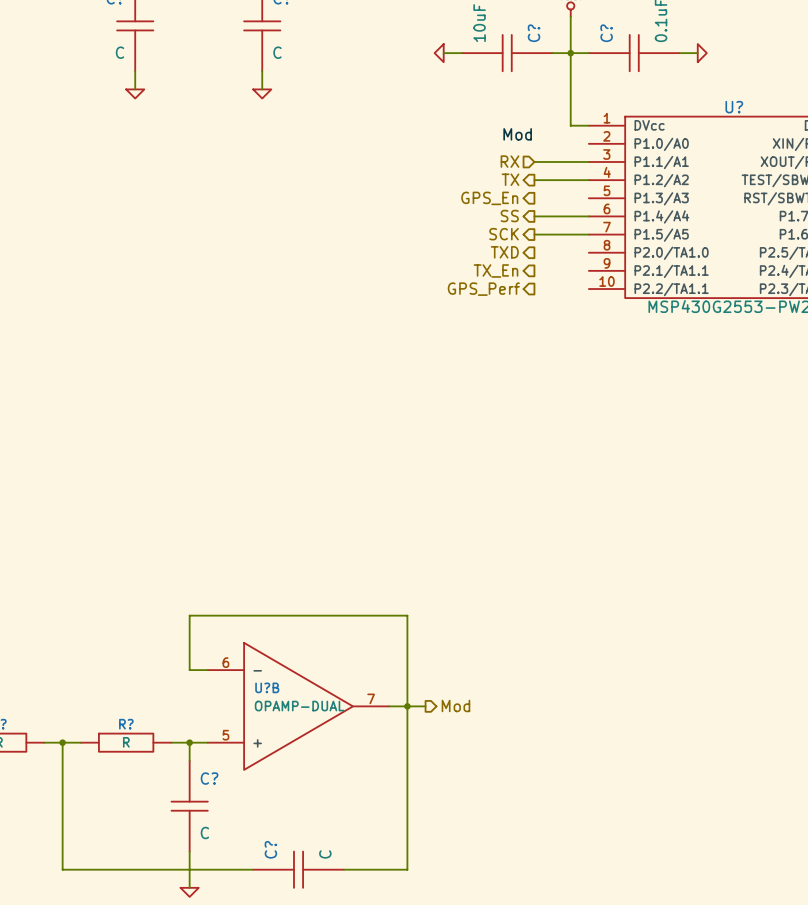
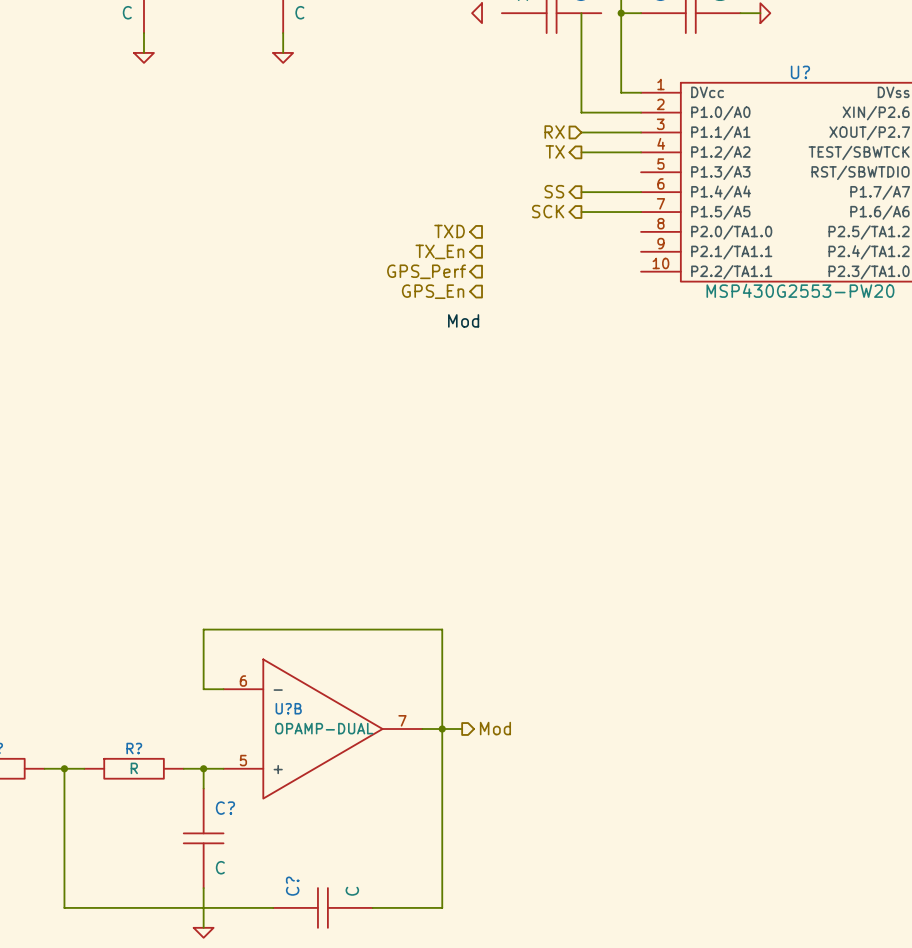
wire: (443, 53) (461, 53) -> none
wire: none -> (581, 13) (581, 112) (641, 112)
wire: (552, 53) (570, 53) -> none
label: Mod (517, 134) -> none
hierarchical label position: GPS_En (489, 198) -> GPS_En (433, 291)
hierarchical label position: TXD (504, 252) -> TXD (449, 231)
hierarchical label position: TX_En (496, 270) -> TX_En (439, 251)
hierarchical label position: GPS_Perf (483, 289) -> GPS_Perf (426, 271)
label: none -> Mod (463, 320)

